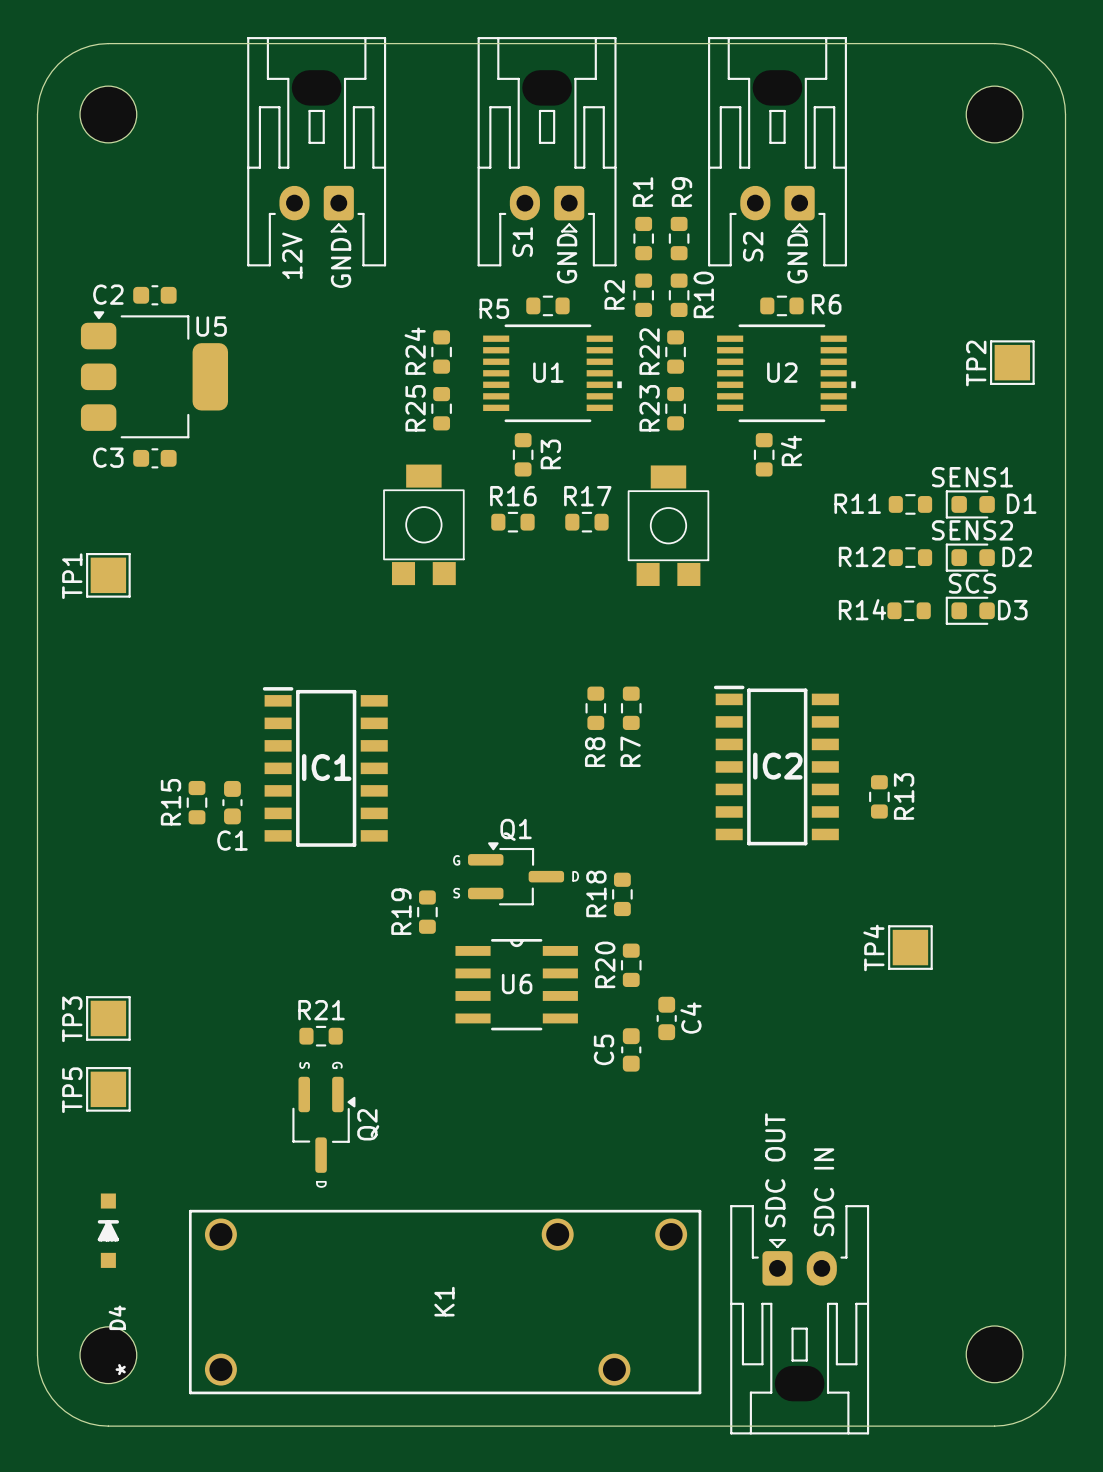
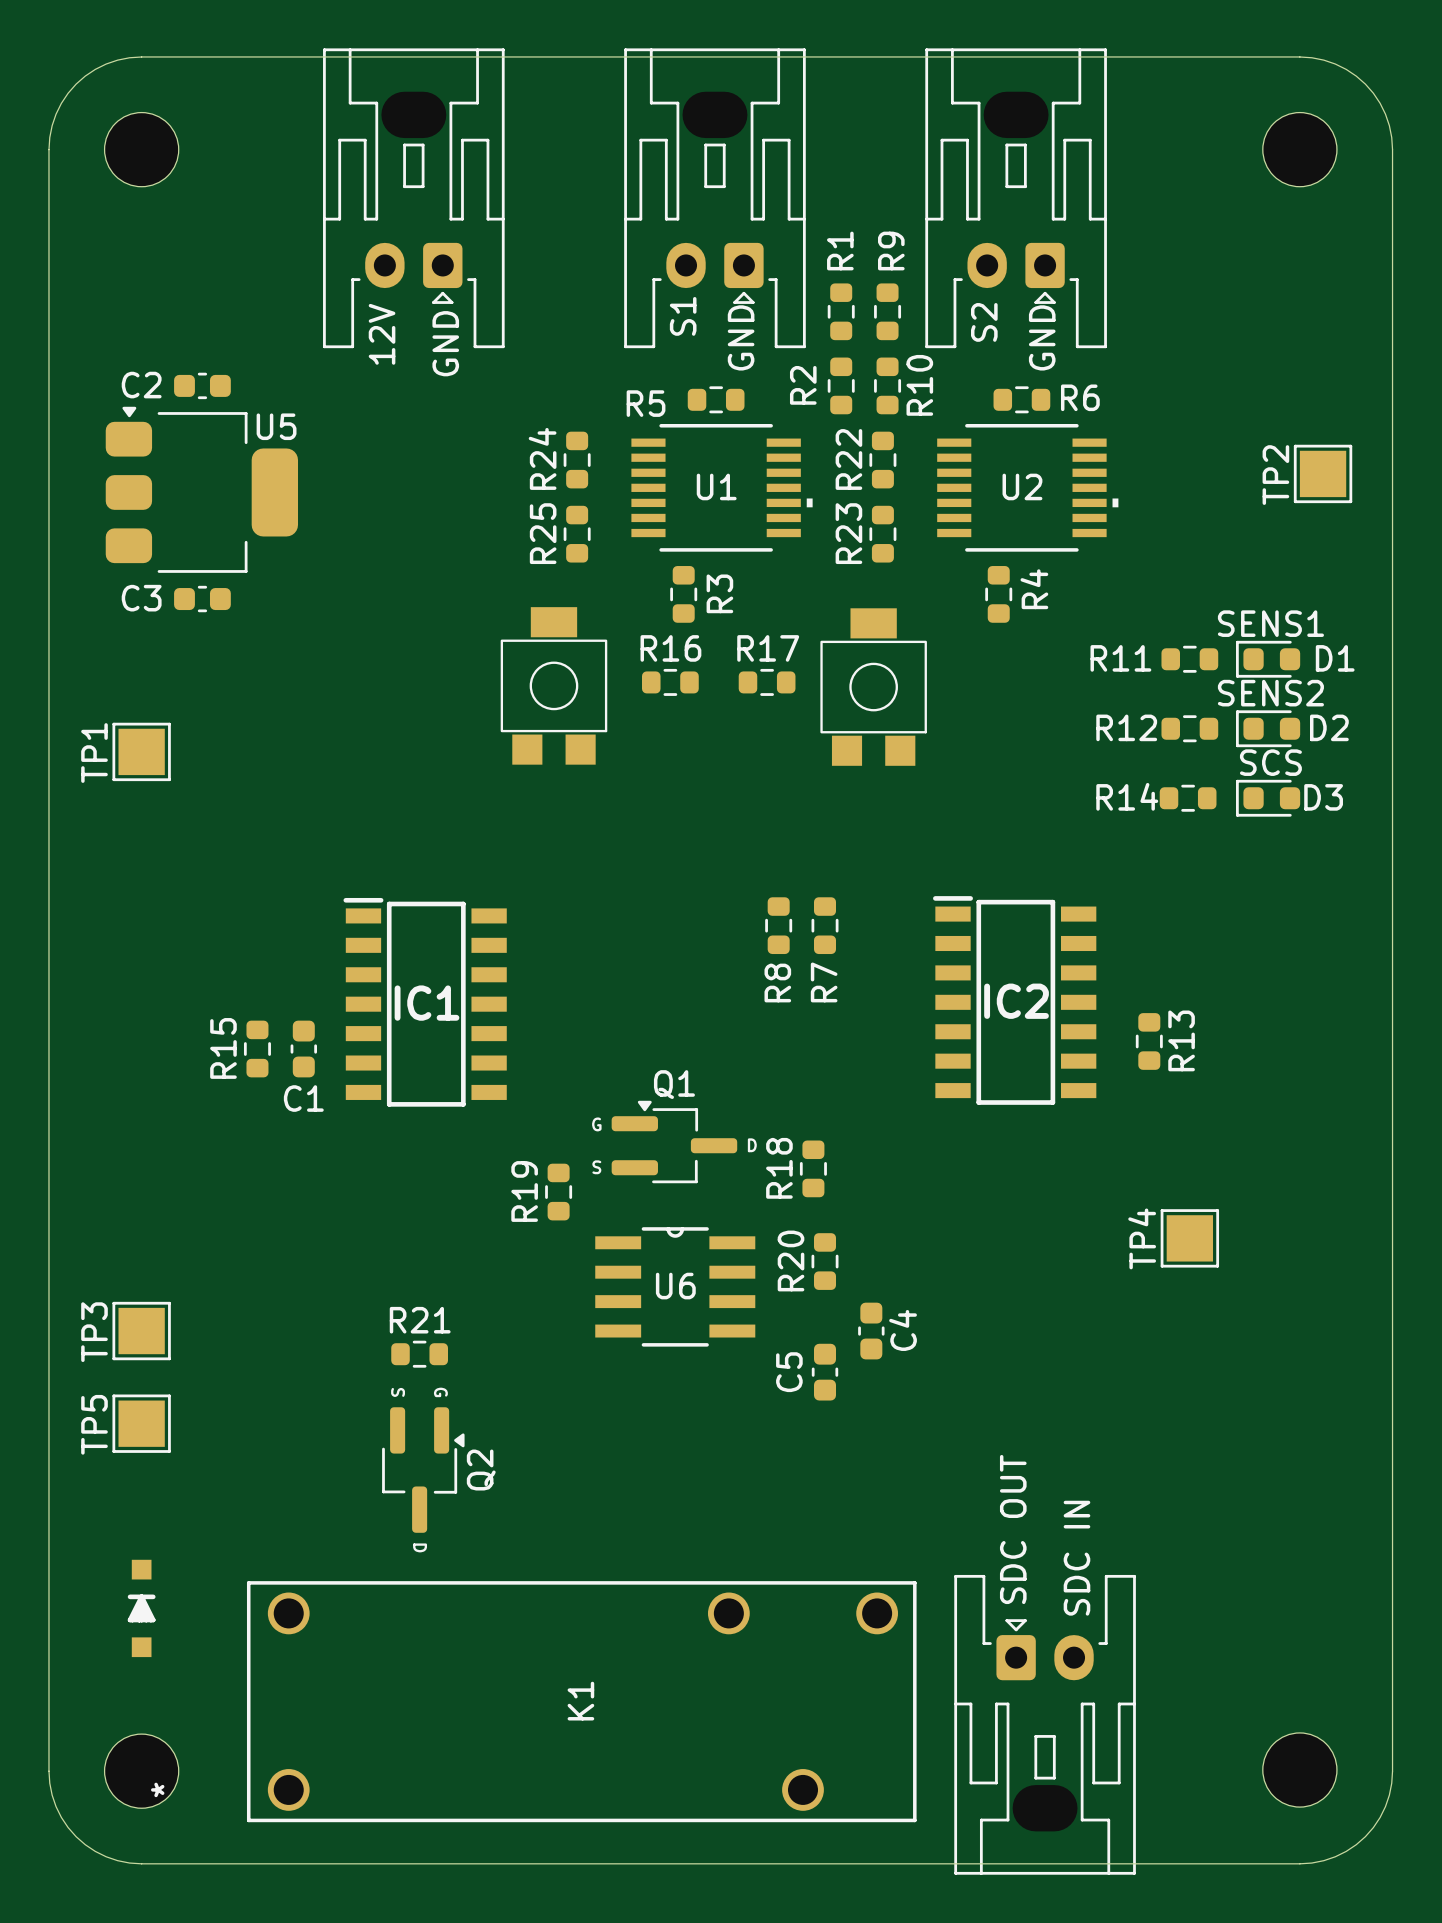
D4 name: D4 (117, 1317) -> none

